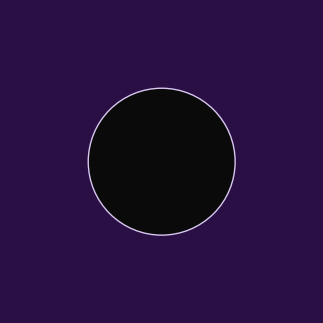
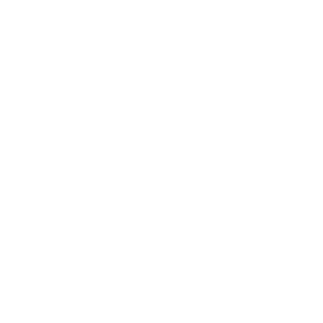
hole: (161, 161) -> none

